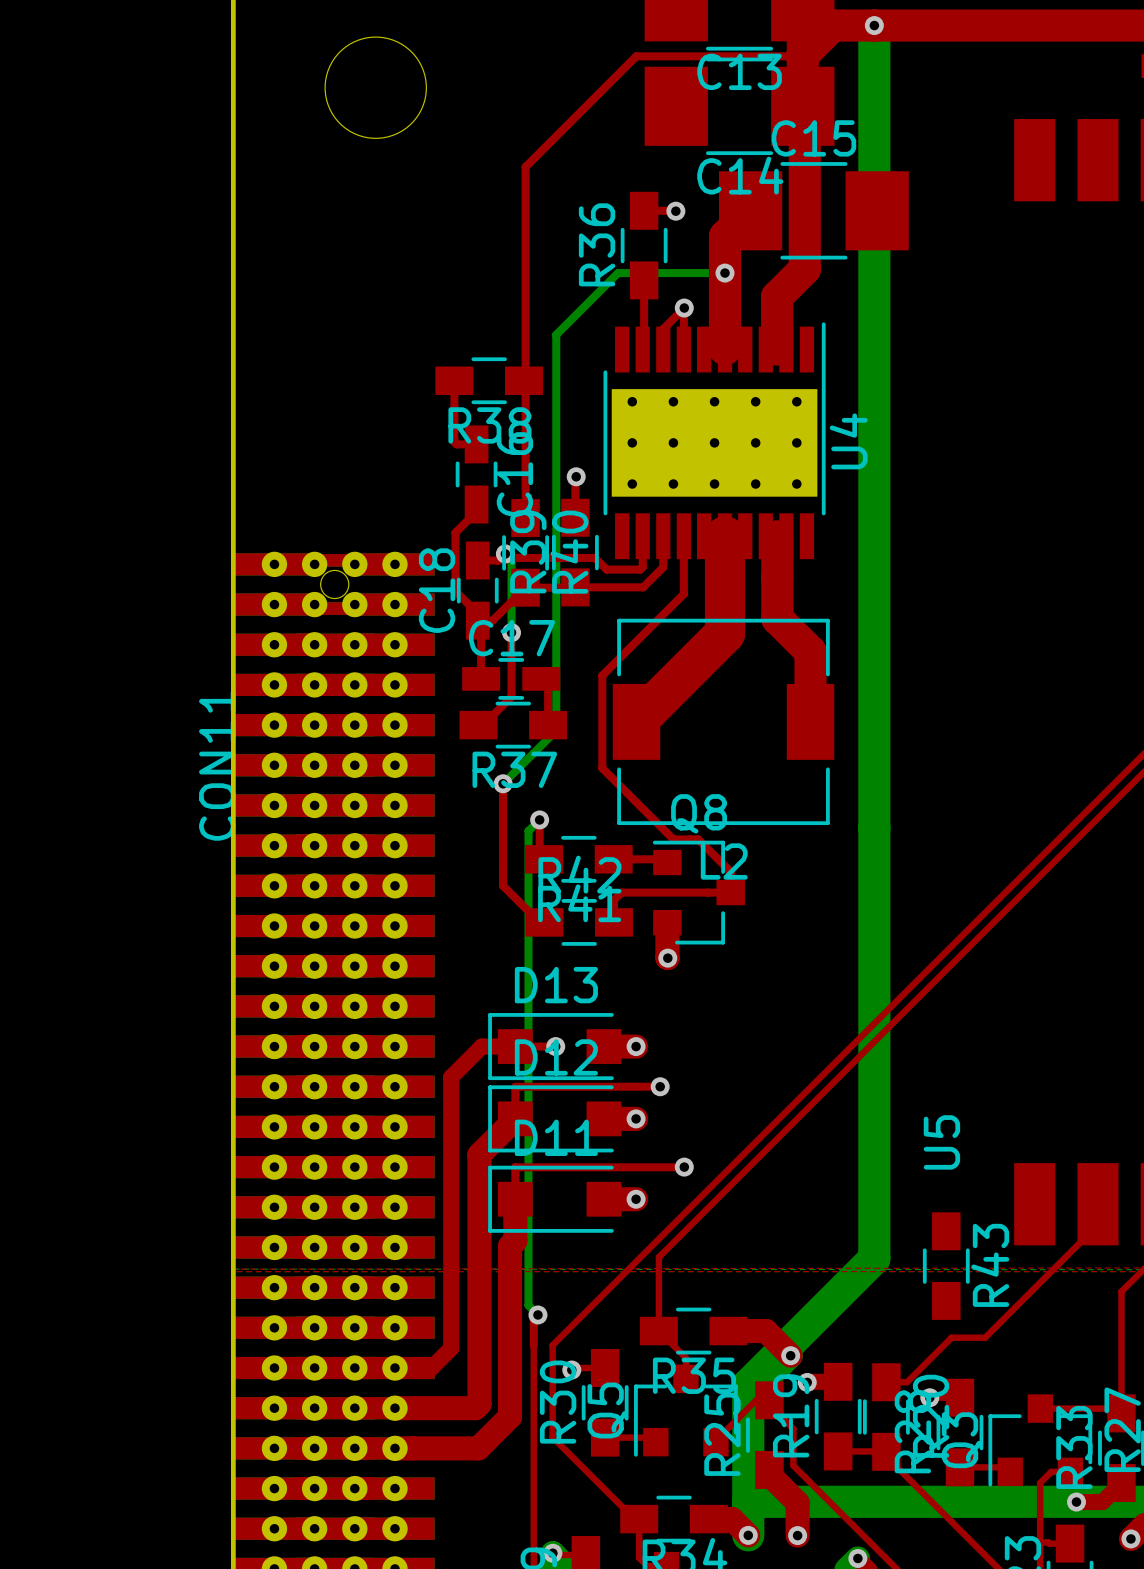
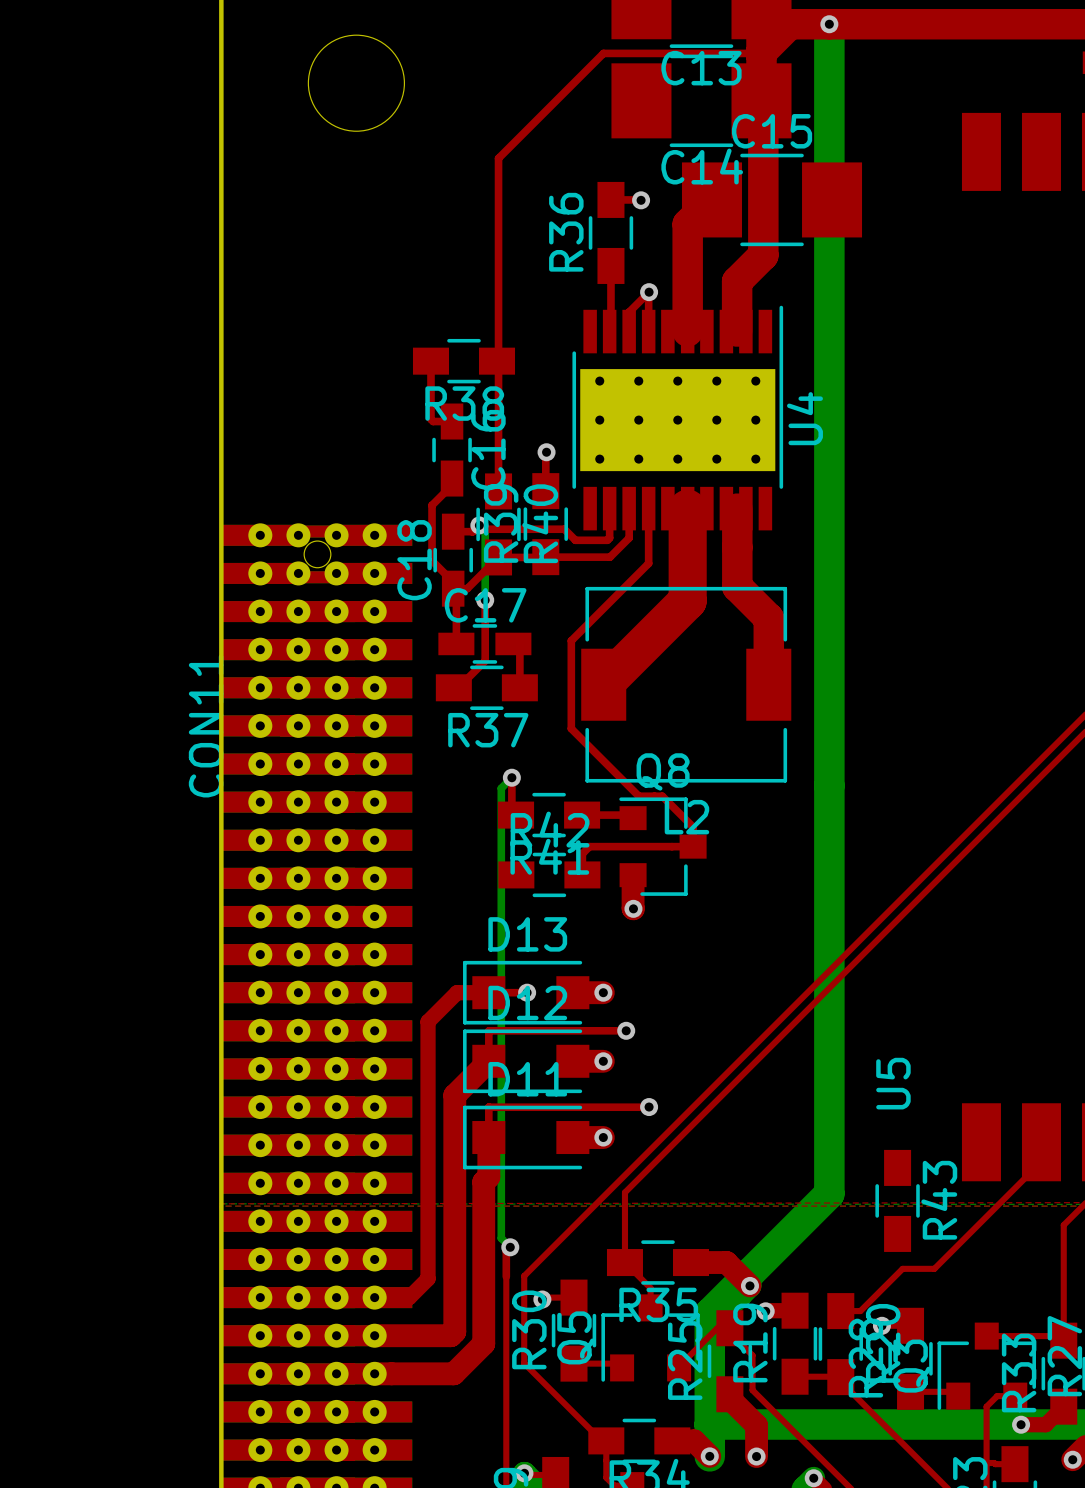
bottom track: (724, 273) (618, 273) (556, 334) (556, 730) (503, 783) -> none
via: (724, 273) -> none
top track: (503, 783) (503, 885) (539, 922) (544, 922) -> none
via: (503, 783) -> none

